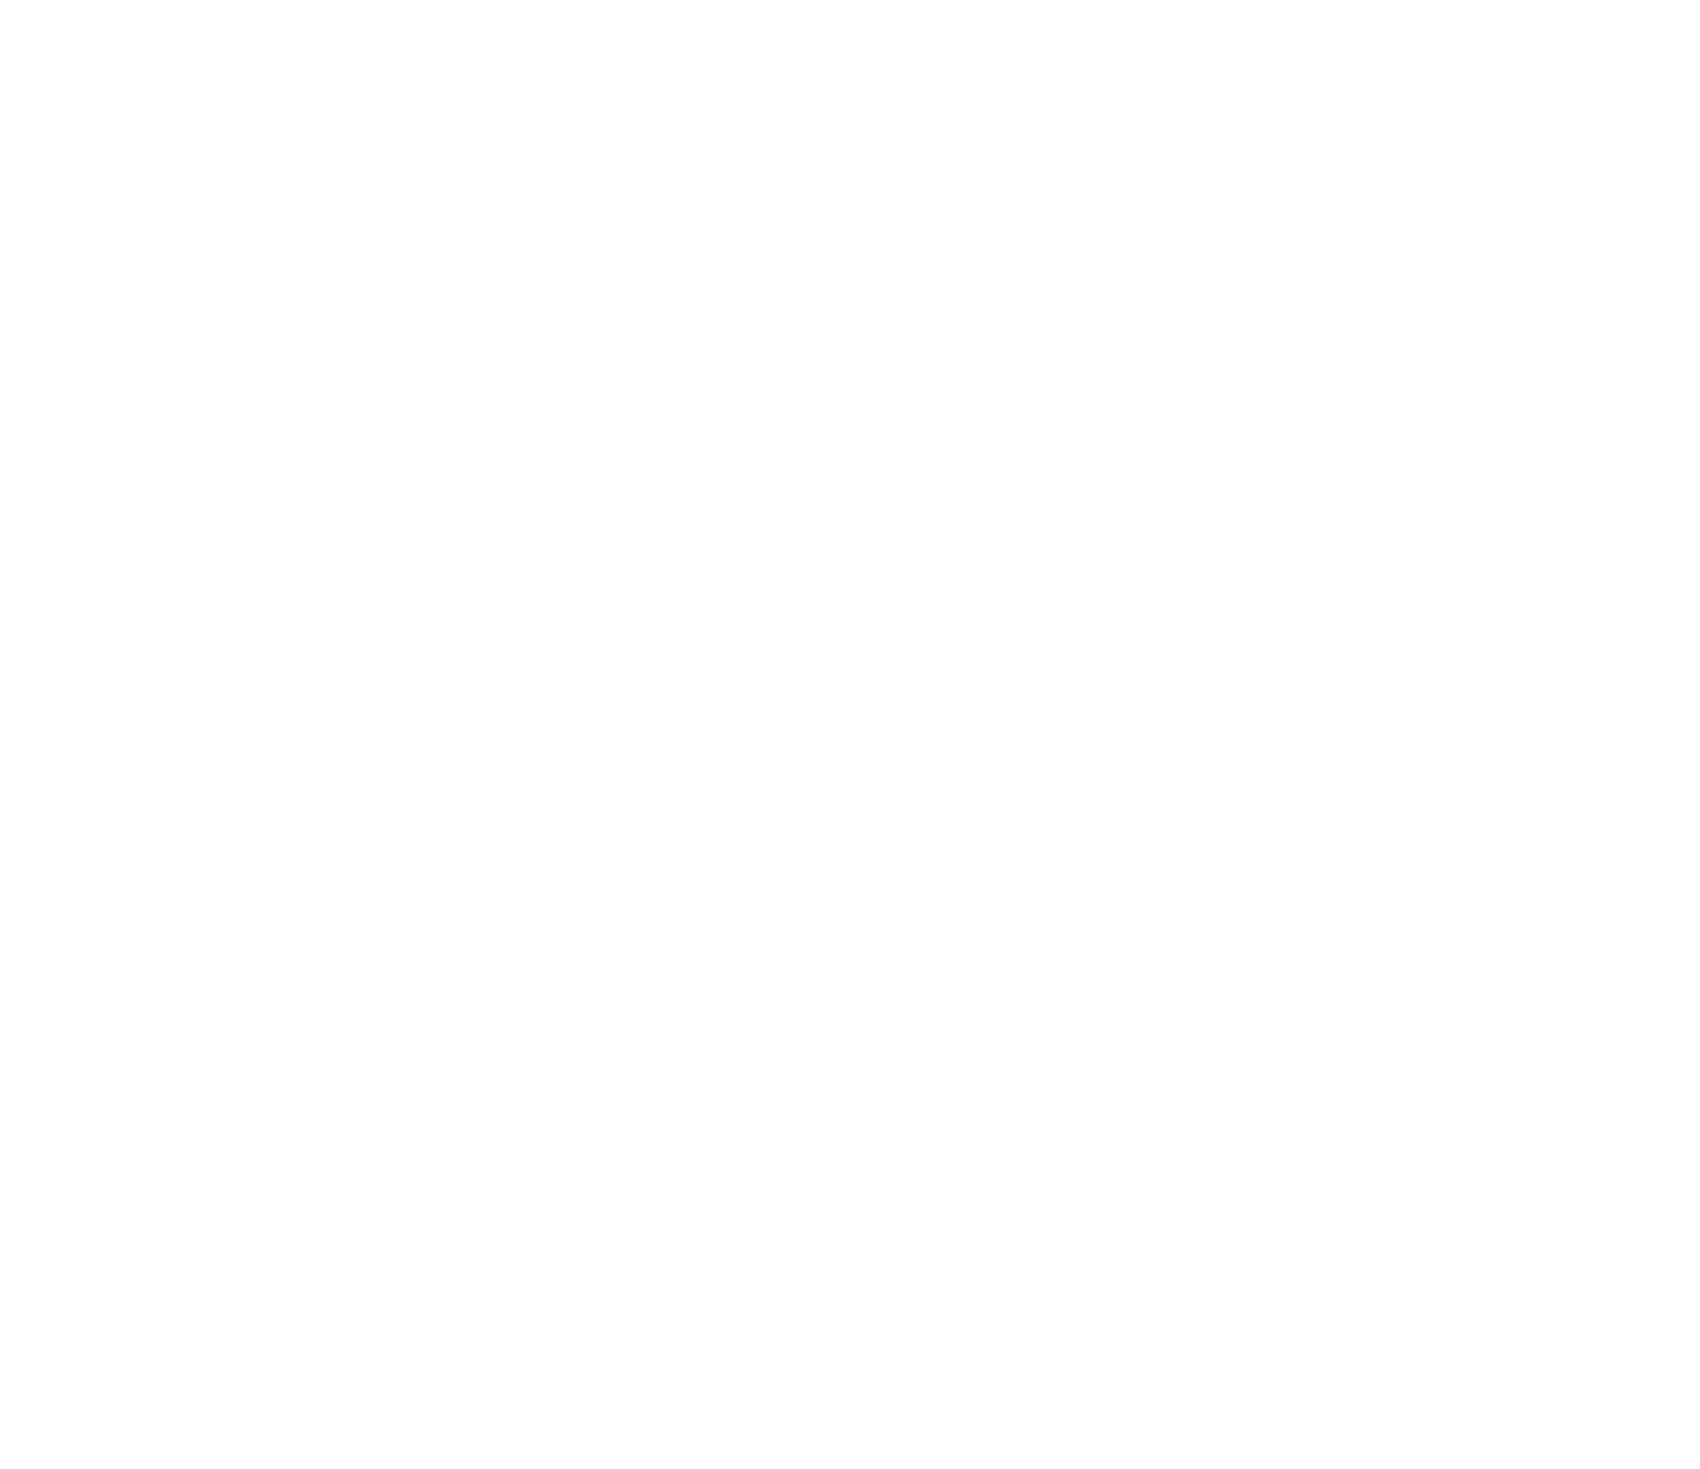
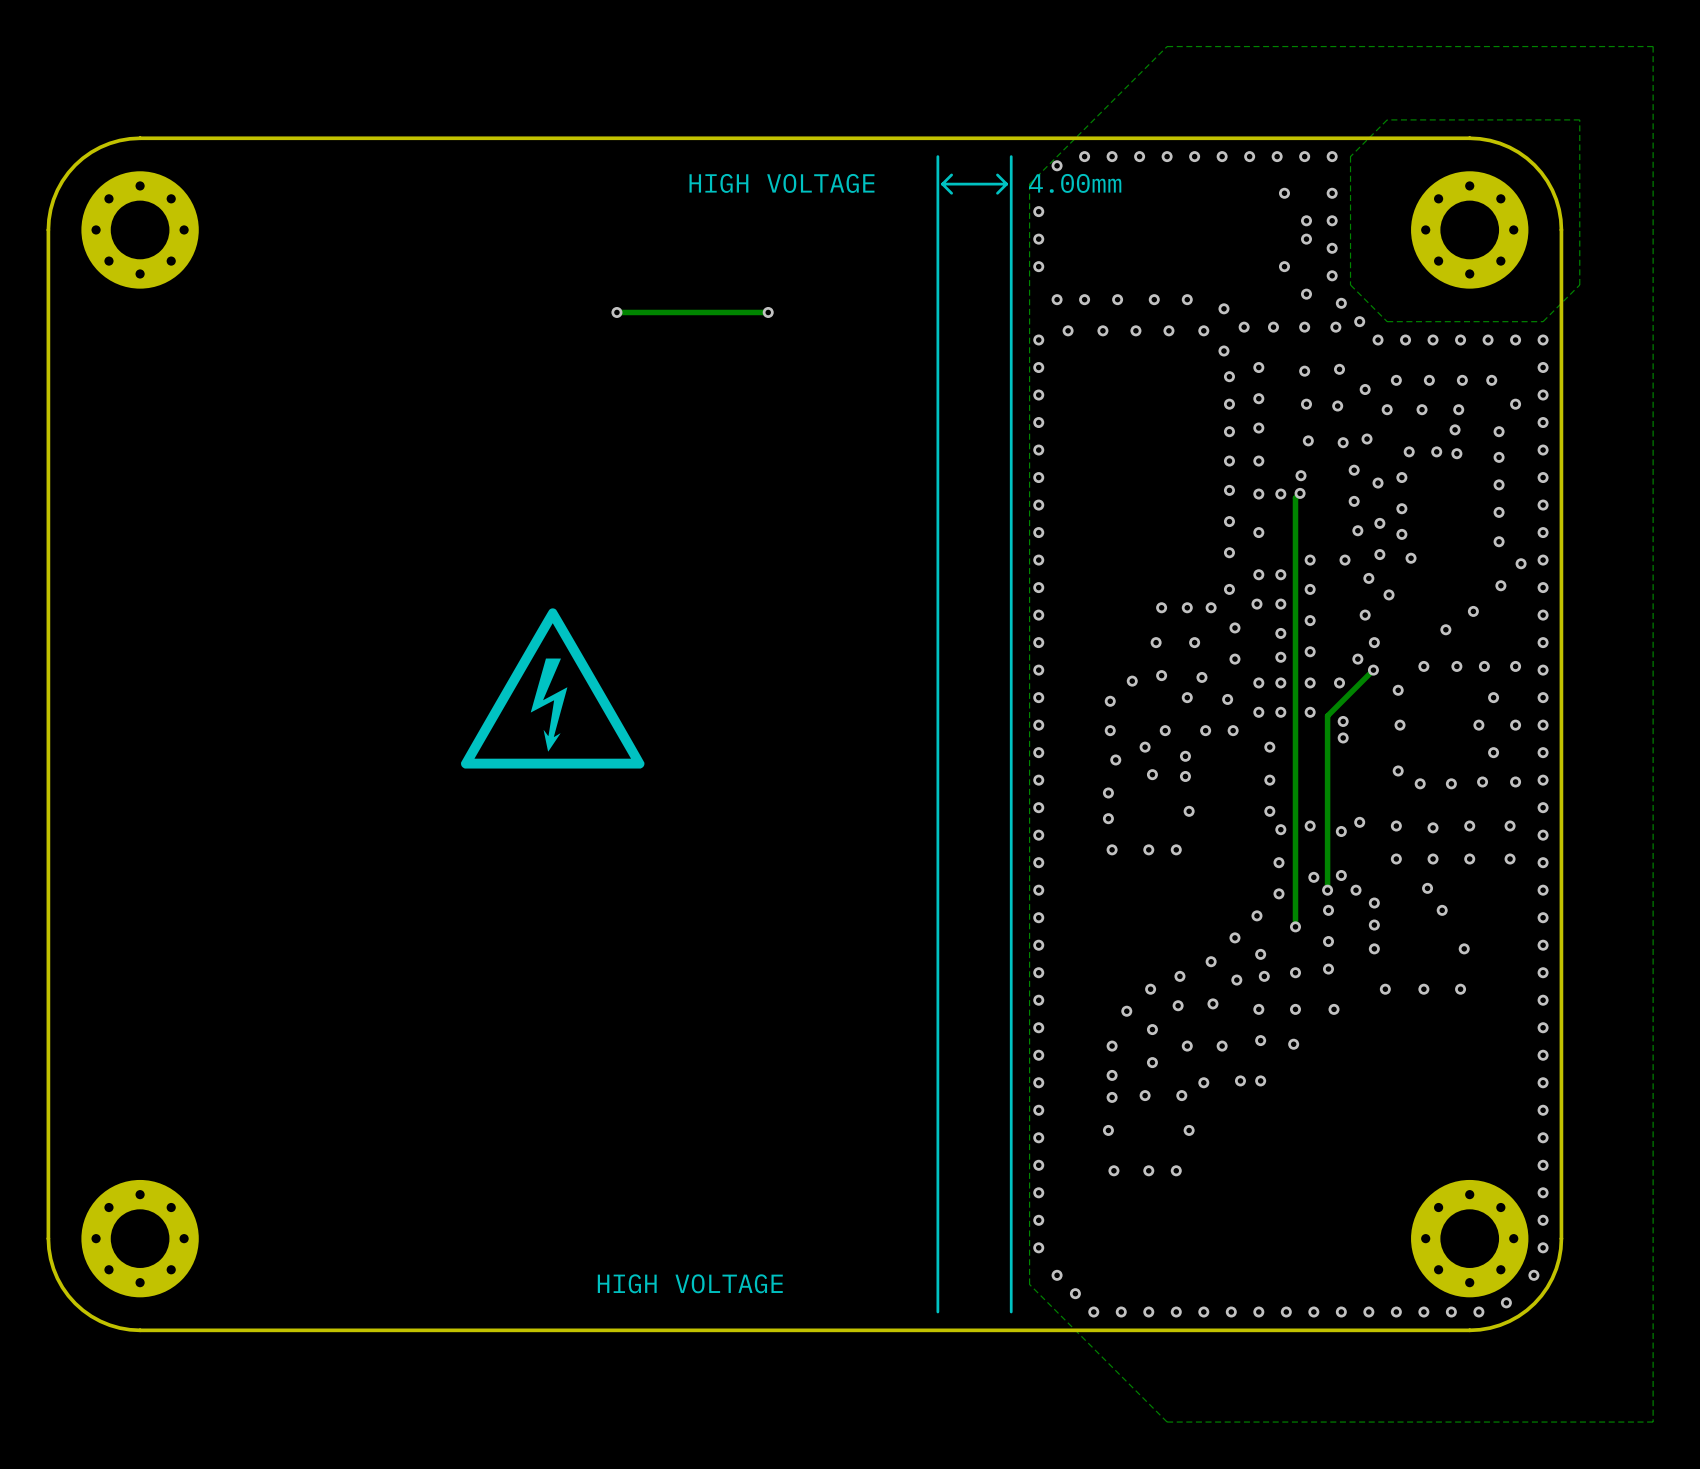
zone outline: none -> (1653, 46) (1653, 1422) (1167, 1422) (1029, 1284) (1029, 184) (1167, 46) (1653, 46)
zone outline: none -> (1579, 119) (1579, 284) (1543, 321) (1387, 321) (1350, 284) (1350, 156) (1387, 119) (1579, 119)
board edge: none -> (1469, 138) (140, 138) (109, 143) (82, 158) (68, 172) (57, 190) (50, 209) (48, 229) (48, 1238) (53, 1268) (68, 1295) (82, 1310) (100, 1321) (119, 1328) (140, 1330) (1469, 1330) (1500, 1325) (1526, 1310) (1541, 1295) (1552, 1278) (1559, 1259) (1561, 1238) (1561, 229) (1559, 209) (1552, 190) (1534, 165) (1518, 152) (1500, 143) (1469, 138)
line: none -> (937, 156) (937, 1312)
line: none -> (1011, 156) (1011, 1312)
via: none -> (1084, 156)
via: none -> (1112, 156)
via: none -> (1139, 156)
via: none -> (1167, 156)
via: none -> (1194, 156)
via: none -> (1222, 156)
via: none -> (1249, 156)
via: none -> (1277, 156)
via: none -> (1304, 156)
via: none -> (1332, 156)
via: none -> (1057, 165)
line: none -> (951, 174) (942, 184)
line: none -> (997, 174) (1006, 184)
text: none -> HIGH VOLTAGE (781, 183)
text: none -> 4.00mm (1075, 183)
line: none -> (942, 184) (951, 193)
line: none -> (1006, 184) (997, 193)
line: none -> (1006, 184) (942, 184)
via: none -> (1284, 193)
via: none -> (1332, 193)
via: none -> (1038, 211)
via: none -> (1306, 220)
via: none -> (1332, 220)
part: none -> (140, 229)
part: none -> (1469, 229)
via: none -> (1038, 239)
via: none -> (1306, 239)
via: none -> (1332, 248)
via: none -> (1038, 266)
via: none -> (1284, 266)
via: none -> (1332, 275)
via: none -> (1306, 294)
via: none -> (1057, 299)
via: none -> (1084, 299)
via: none -> (1117, 299)
via: none -> (1154, 299)
via: none -> (1187, 299)
via: none -> (1341, 303)
via: none -> (1223, 308)
via: none -> (616, 312)
track: none -> (768, 312) (616, 312)
via: none -> (768, 312)
via: none -> (1359, 321)
via: none -> (1244, 327)
via: none -> (1273, 327)
via: none -> (1304, 327)
via: none -> (1335, 327)
via: none -> (1068, 330)
via: none -> (1102, 330)
via: none -> (1135, 330)
via: none -> (1168, 330)
via: none -> (1203, 330)
via: none -> (1038, 339)
via: none -> (1378, 339)
via: none -> (1405, 339)
via: none -> (1433, 339)
via: none -> (1460, 339)
via: none -> (1488, 339)
via: none -> (1515, 339)
via: none -> (1543, 339)
via: none -> (1223, 351)
via: none -> (1038, 367)
via: none -> (1258, 367)
via: none -> (1543, 367)
via: none -> (1339, 369)
via: none -> (1304, 371)
via: none -> (1229, 376)
via: none -> (1396, 380)
via: none -> (1429, 380)
via: none -> (1462, 380)
via: none -> (1491, 380)
via: none -> (1365, 389)
via: none -> (1038, 395)
via: none -> (1543, 395)
via: none -> (1258, 398)
via: none -> (1229, 404)
via: none -> (1306, 404)
via: none -> (1515, 404)
via: none -> (1337, 406)
via: none -> (1387, 409)
via: none -> (1422, 409)
via: none -> (1458, 409)
via: none -> (1038, 422)
via: none -> (1543, 422)
via: none -> (1258, 428)
via: none -> (1455, 429)
via: none -> (1229, 431)
via: none -> (1499, 431)
via: none -> (1367, 439)
via: none -> (1308, 440)
via: none -> (1343, 442)
via: none -> (1038, 450)
via: none -> (1543, 450)
via: none -> (1409, 451)
via: none -> (1436, 451)
via: none -> (1456, 453)
via: none -> (1499, 457)
via: none -> (1229, 461)
via: none -> (1258, 461)
via: none -> (1354, 470)
via: none -> (1300, 475)
via: none -> (1038, 477)
via: none -> (1401, 477)
via: none -> (1543, 477)
via: none -> (1378, 483)
via: none -> (1499, 484)
via: none -> (1229, 490)
track: none -> (1300, 493) (1295, 497) (1295, 926)
via: none -> (1300, 493)
via: none -> (1258, 494)
via: none -> (1280, 494)
via: none -> (1354, 501)
via: none -> (1038, 505)
via: none -> (1543, 505)
via: none -> (1401, 508)
via: none -> (1499, 512)
via: none -> (1229, 521)
via: none -> (1379, 523)
via: none -> (1357, 530)
via: none -> (1038, 532)
via: none -> (1258, 532)
via: none -> (1543, 532)
via: none -> (1401, 534)
via: none -> (1499, 541)
via: none -> (1229, 552)
via: none -> (1379, 554)
via: none -> (1411, 558)
via: none -> (1038, 560)
via: none -> (1310, 560)
via: none -> (1345, 560)
via: none -> (1543, 560)
via: none -> (1521, 563)
via: none -> (1258, 574)
via: none -> (1280, 574)
via: none -> (1368, 578)
via: none -> (1500, 585)
via: none -> (1038, 587)
via: none -> (1543, 587)
via: none -> (1229, 589)
via: none -> (1310, 589)
via: none -> (1389, 594)
via: none -> (1256, 604)
via: none -> (1280, 604)
via: none -> (1161, 607)
via: none -> (1187, 607)
via: none -> (1211, 607)
drawing: none -> [461, 608, 645, 769]
via: none -> (1473, 611)
via: none -> (1038, 615)
via: none -> (1365, 615)
via: none -> (1543, 615)
via: none -> (1310, 620)
via: none -> (1234, 627)
via: none -> (1445, 629)
via: none -> (1280, 633)
via: none -> (1038, 642)
via: none -> (1156, 642)
via: none -> (1194, 642)
via: none -> (1374, 642)
via: none -> (1543, 642)
via: none -> (1310, 651)
via: none -> (1280, 657)
via: none -> (1234, 659)
via: none -> (1357, 659)
via: none -> (1423, 666)
via: none -> (1456, 666)
via: none -> (1484, 666)
via: none -> (1515, 666)
via: none -> (1038, 670)
track: none -> (1373, 670) (1327, 715) (1327, 890)
via: none -> (1373, 670)
via: none -> (1543, 670)
via: none -> (1161, 675)
via: none -> (1201, 677)
via: none -> (1132, 681)
via: none -> (1258, 682)
via: none -> (1280, 682)
via: none -> (1310, 682)
via: none -> (1339, 682)
via: none -> (1398, 690)
via: none -> (1038, 697)
via: none -> (1187, 697)
via: none -> (1493, 697)
via: none -> (1543, 697)
via: none -> (1227, 699)
via: none -> (1110, 701)
via: none -> (1258, 712)
via: none -> (1280, 712)
via: none -> (1310, 712)
via: none -> (1343, 721)
via: none -> (1038, 725)
via: none -> (1400, 725)
via: none -> (1478, 725)
via: none -> (1515, 725)
via: none -> (1543, 725)
via: none -> (1110, 730)
via: none -> (1165, 730)
via: none -> (1205, 730)
via: none -> (1233, 730)
via: none -> (1343, 737)
via: none -> (1145, 747)
via: none -> (1269, 747)
via: none -> (1038, 752)
via: none -> (1493, 752)
via: none -> (1543, 752)
via: none -> (1185, 756)
via: none -> (1115, 759)
via: none -> (1398, 770)
via: none -> (1152, 774)
via: none -> (1185, 776)
via: none -> (1038, 780)
via: none -> (1269, 780)
via: none -> (1543, 780)
via: none -> (1482, 781)
via: none -> (1515, 781)
via: none -> (1420, 783)
via: none -> (1451, 783)
via: none -> (1108, 792)
via: none -> (1038, 807)
via: none -> (1543, 807)
via: none -> (1189, 811)
via: none -> (1269, 811)
via: none -> (1108, 818)
via: none -> (1359, 822)
via: none -> (1310, 826)
via: none -> (1396, 826)
via: none -> (1469, 826)
via: none -> (1510, 826)
via: none -> (1433, 827)
via: none -> (1280, 829)
via: none -> (1341, 831)
via: none -> (1038, 835)
via: none -> (1543, 835)
via: none -> (1112, 849)
via: none -> (1148, 849)
via: none -> (1176, 849)
via: none -> (1396, 859)
via: none -> (1433, 859)
via: none -> (1469, 859)
via: none -> (1510, 859)
via: none -> (1038, 862)
via: none -> (1278, 862)
via: none -> (1543, 862)
via: none -> (1341, 875)
via: none -> (1313, 877)
via: none -> (1427, 888)
via: none -> (1038, 890)
via: none -> (1327, 890)
via: none -> (1356, 890)
via: none -> (1543, 890)
via: none -> (1278, 893)
via: none -> (1374, 903)
via: none -> (1328, 910)
via: none -> (1442, 910)
via: none -> (1256, 915)
via: none -> (1038, 917)
via: none -> (1543, 917)
via: none -> (1374, 925)
via: none -> (1295, 926)
via: none -> (1234, 937)
via: none -> (1328, 941)
via: none -> (1038, 945)
via: none -> (1543, 945)
via: none -> (1374, 948)
via: none -> (1464, 948)
via: none -> (1260, 954)
via: none -> (1211, 961)
via: none -> (1328, 969)
via: none -> (1038, 972)
via: none -> (1295, 972)
via: none -> (1543, 972)
via: none -> (1179, 976)
via: none -> (1264, 976)
via: none -> (1236, 980)
via: none -> (1150, 989)
via: none -> (1385, 989)
via: none -> (1423, 989)
via: none -> (1460, 989)
via: none -> (1038, 1000)
via: none -> (1543, 1000)
via: none -> (1212, 1003)
via: none -> (1178, 1005)
via: none -> (1258, 1009)
via: none -> (1295, 1009)
via: none -> (1334, 1009)
via: none -> (1126, 1011)
via: none -> (1038, 1027)
via: none -> (1543, 1027)
via: none -> (1152, 1029)
via: none -> (1260, 1040)
via: none -> (1293, 1044)
via: none -> (1112, 1046)
via: none -> (1187, 1046)
via: none -> (1222, 1046)
via: none -> (1038, 1055)
via: none -> (1543, 1055)
via: none -> (1152, 1062)
via: none -> (1112, 1075)
via: none -> (1240, 1080)
via: none -> (1260, 1080)
via: none -> (1038, 1082)
via: none -> (1203, 1082)
via: none -> (1543, 1082)
via: none -> (1145, 1095)
via: none -> (1181, 1095)
via: none -> (1112, 1097)
via: none -> (1038, 1110)
via: none -> (1543, 1110)
via: none -> (1108, 1130)
via: none -> (1189, 1130)
via: none -> (1038, 1137)
via: none -> (1543, 1137)
via: none -> (1038, 1165)
via: none -> (1543, 1165)
via: none -> (1113, 1170)
via: none -> (1148, 1170)
via: none -> (1176, 1170)
via: none -> (1038, 1192)
via: none -> (1543, 1192)
via: none -> (1038, 1220)
via: none -> (1543, 1220)
part: none -> (140, 1238)
part: none -> (1469, 1238)
via: none -> (1038, 1247)
via: none -> (1543, 1247)
via: none -> (1057, 1275)
via: none -> (1533, 1275)
text: none -> HIGH VOLTAGE (690, 1283)
via: none -> (1075, 1293)
via: none -> (1506, 1302)
via: none -> (1093, 1312)
via: none -> (1121, 1312)
via: none -> (1148, 1312)
via: none -> (1176, 1312)
via: none -> (1203, 1312)
via: none -> (1231, 1312)
via: none -> (1258, 1312)
via: none -> (1286, 1312)
via: none -> (1313, 1312)
via: none -> (1341, 1312)
via: none -> (1368, 1312)
via: none -> (1396, 1312)
via: none -> (1423, 1312)
via: none -> (1451, 1312)
via: none -> (1478, 1312)

